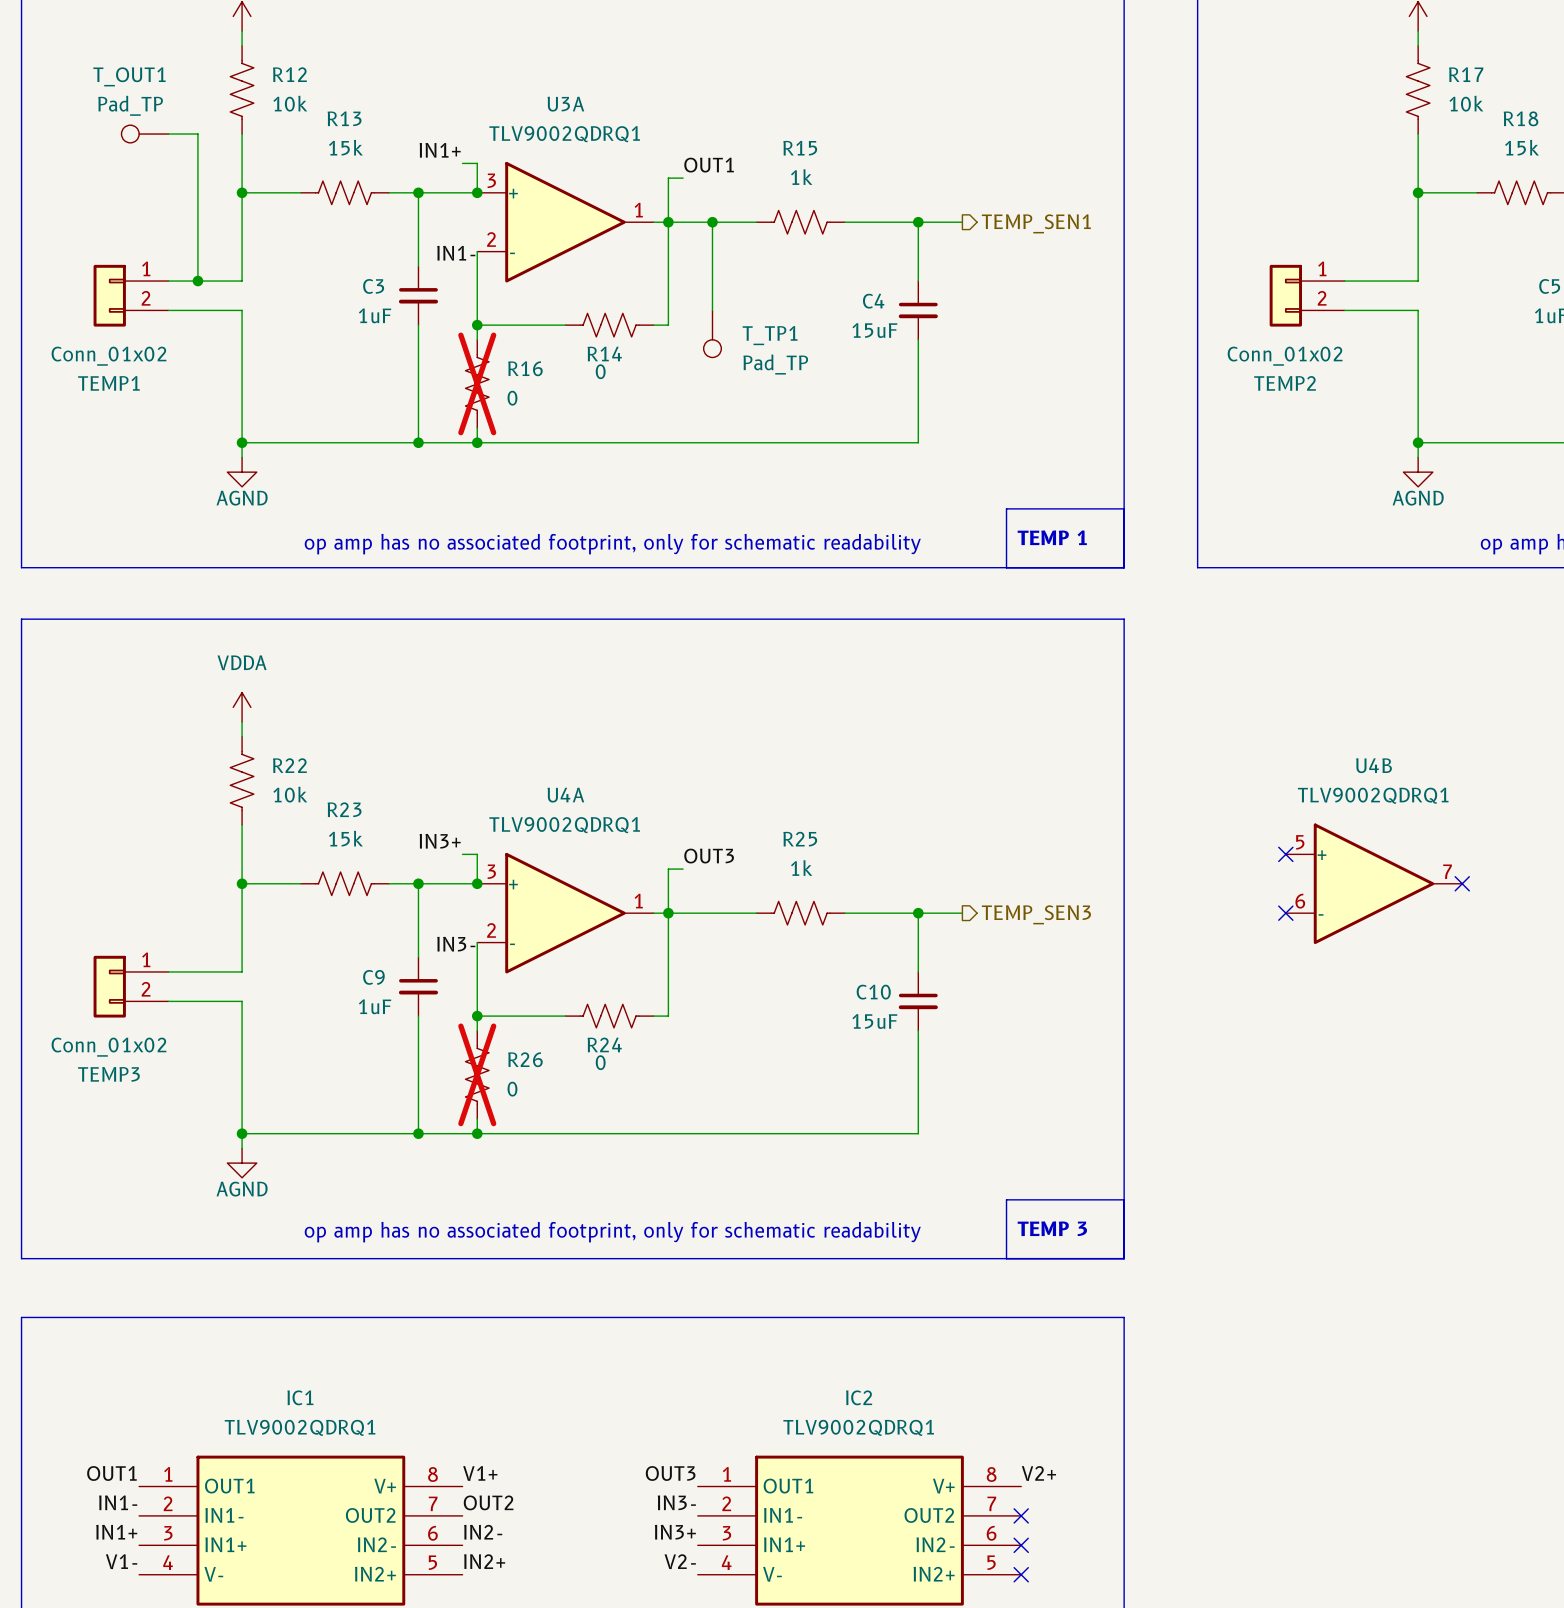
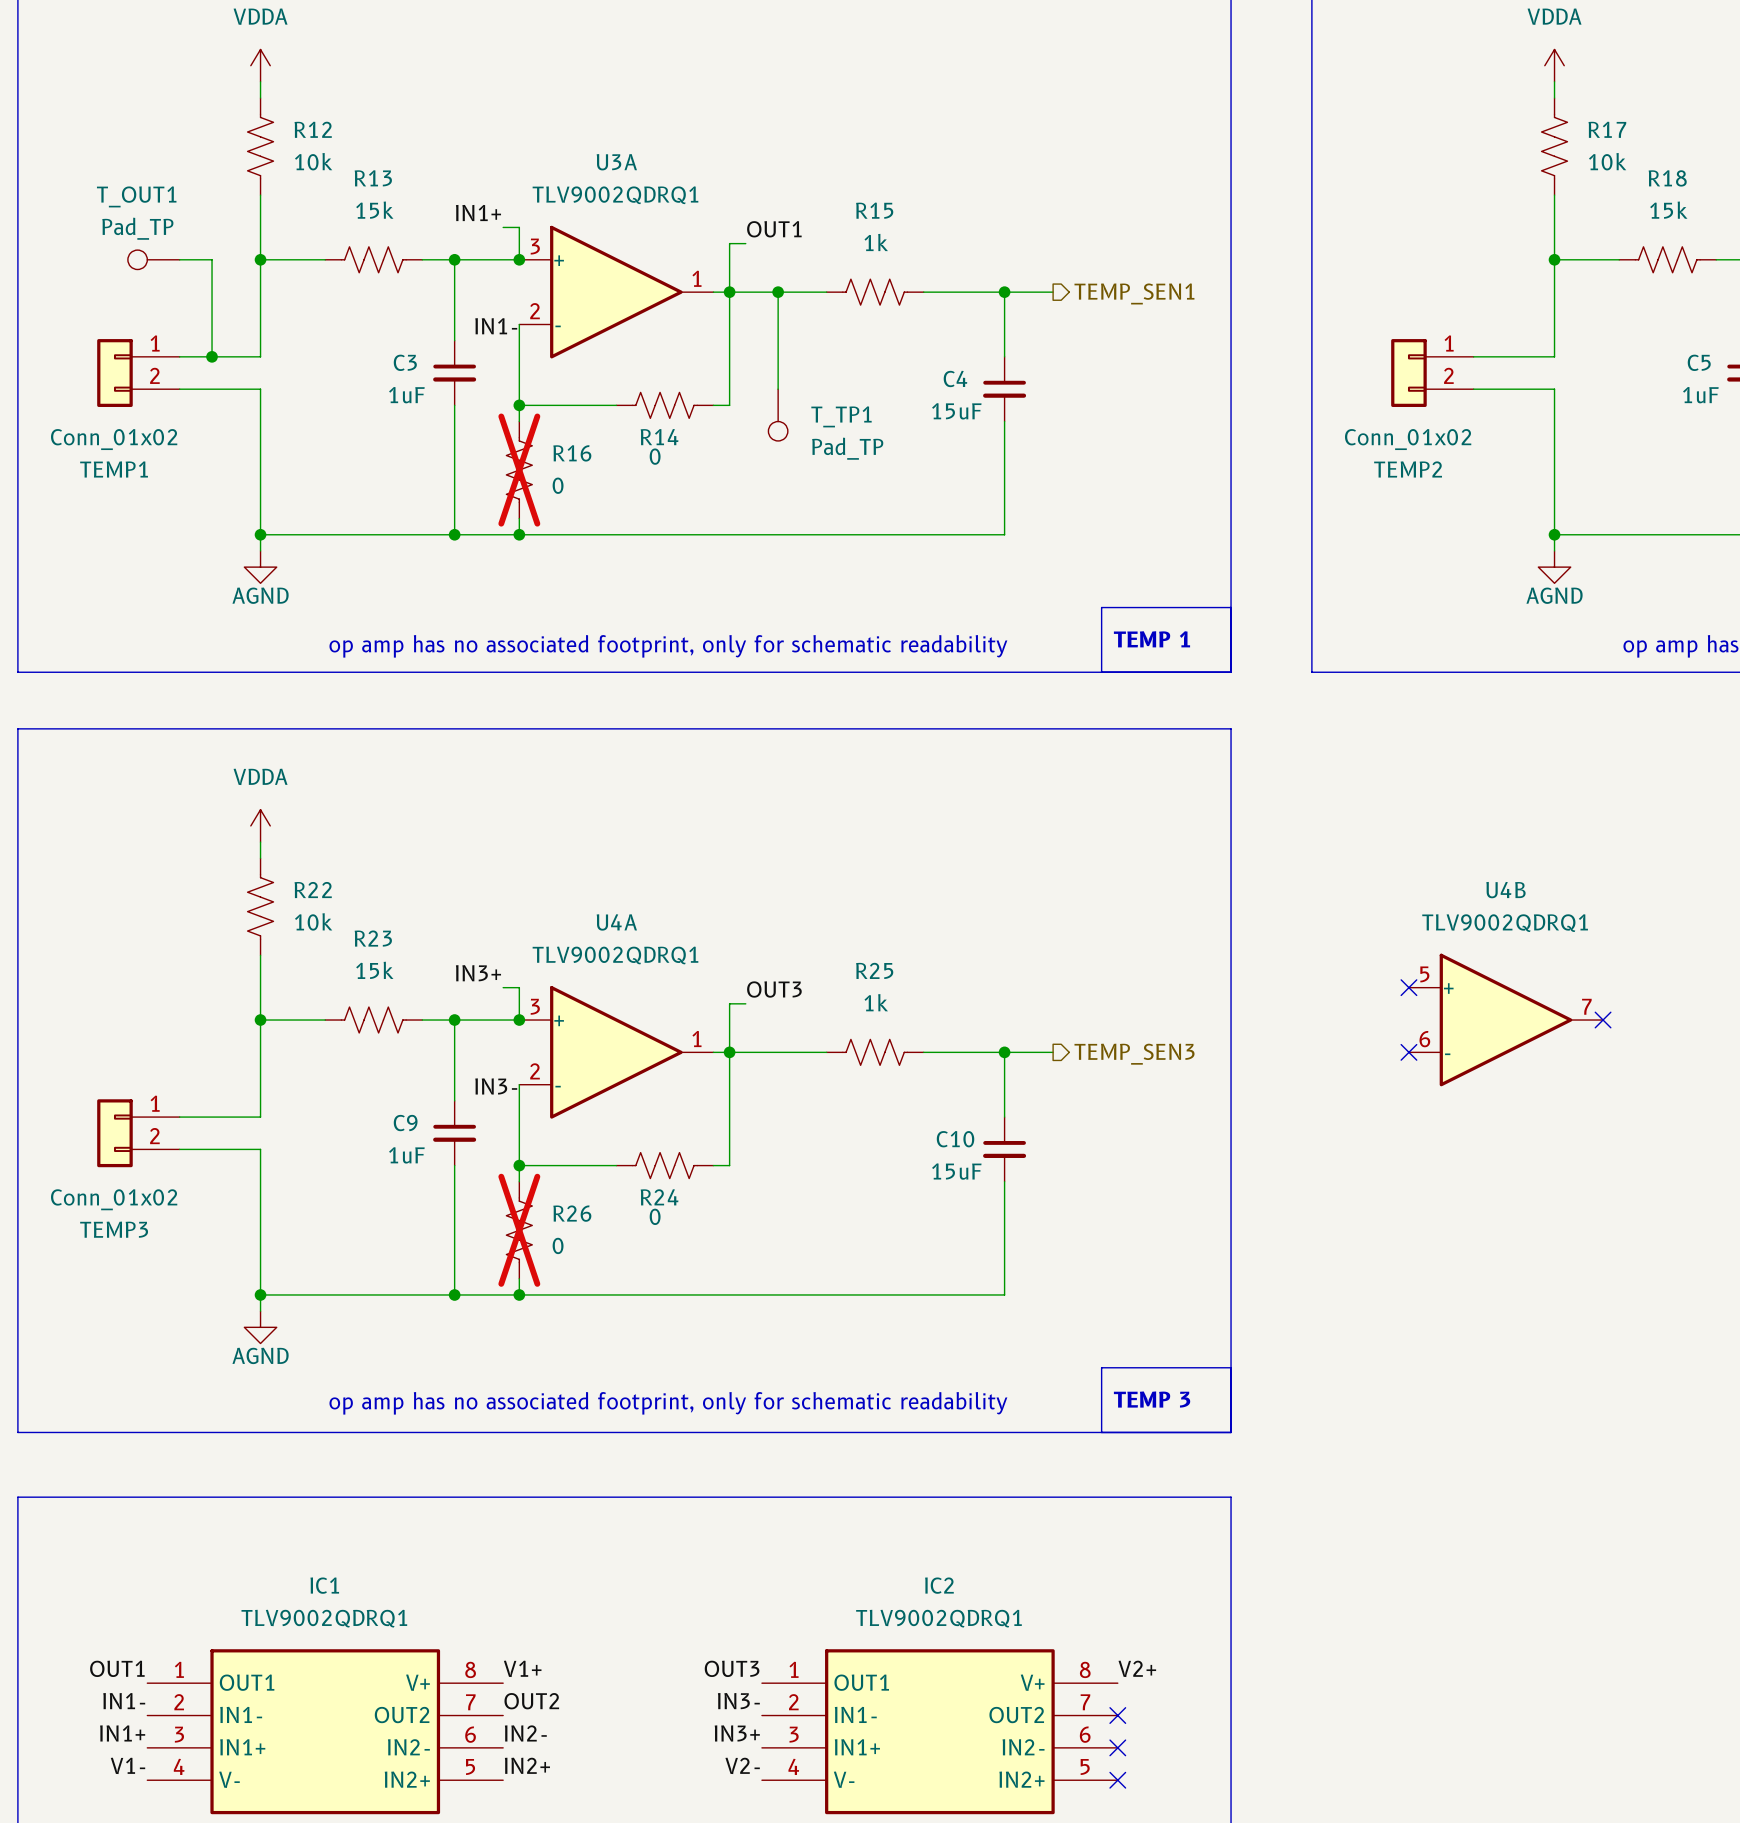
T_OUT1 position: (145, 134) -> (153, 259)
wire: (168, 134) (197, 134) (197, 192) -> (179, 259) (212, 259)

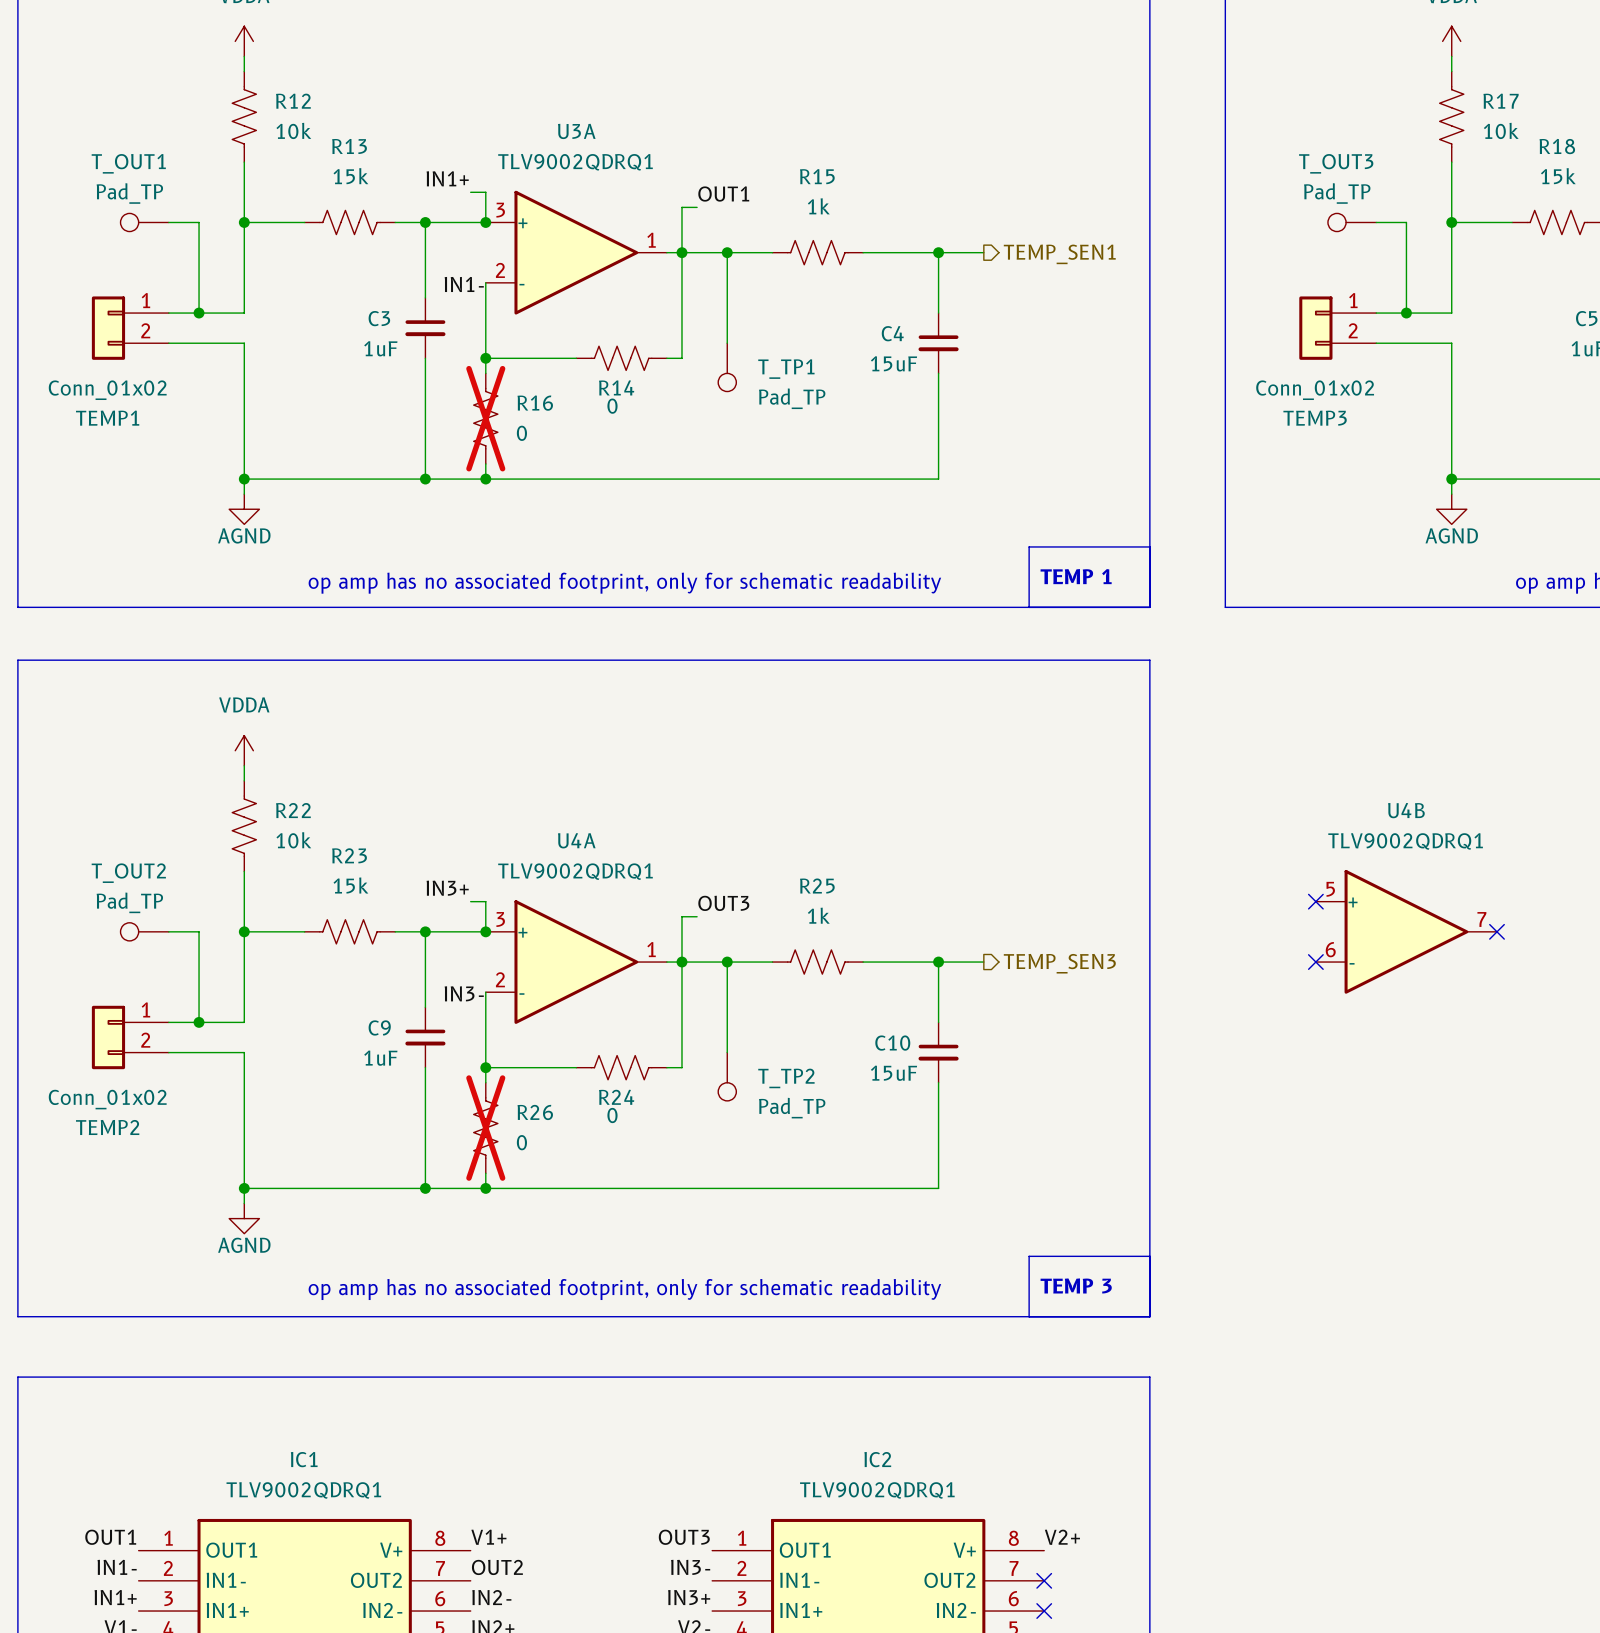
T_OUT3: none -> Pad_TP (1352, 222)
wire: none -> (1376, 222) (1406, 222) (1406, 313)
junction: none -> (1406, 313)
TEMP2 name: TEMP2 (1408, 469) -> TEMP3 (1315, 418)
T_OUT2: none -> Pad_TP (144, 931)
wire: none -> (168, 931) (199, 931) (199, 1022)
wire: none -> (727, 962) (727, 1052)
junction: none -> (727, 962)
junction: none -> (199, 1022)
T_TP2: none -> Pad_TP (727, 1076)
TEMP3 name: TEMP3 (114, 1229) -> TEMP2 (107, 1127)

